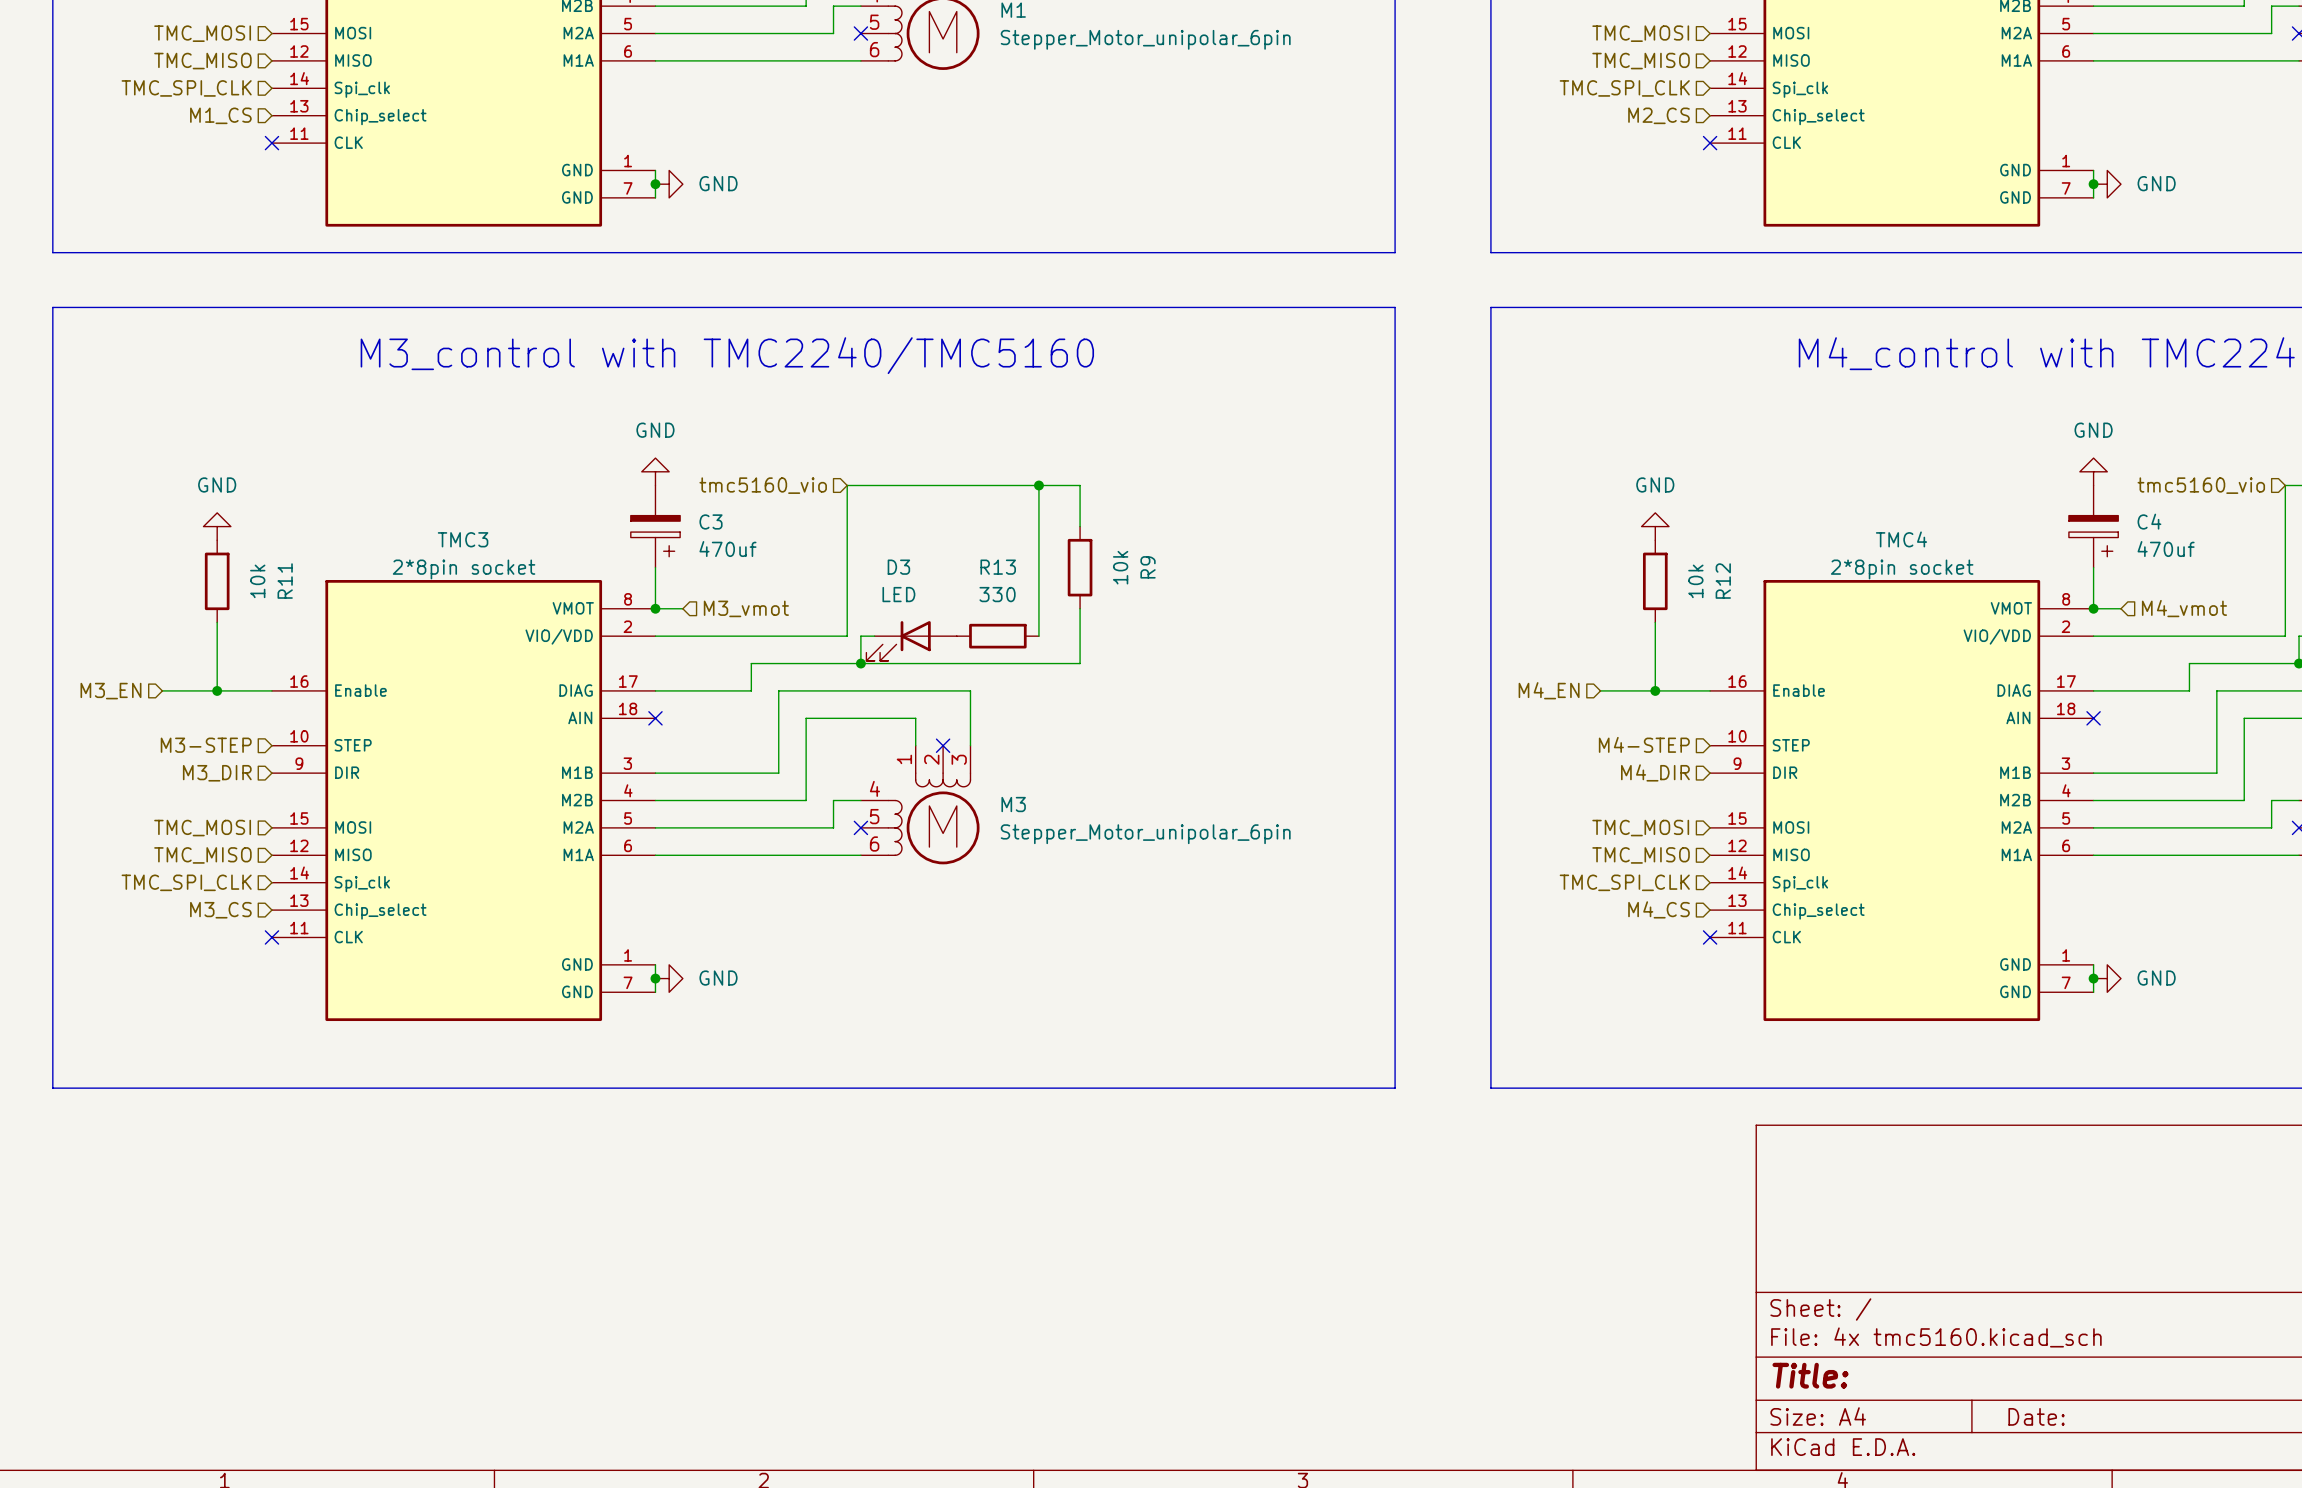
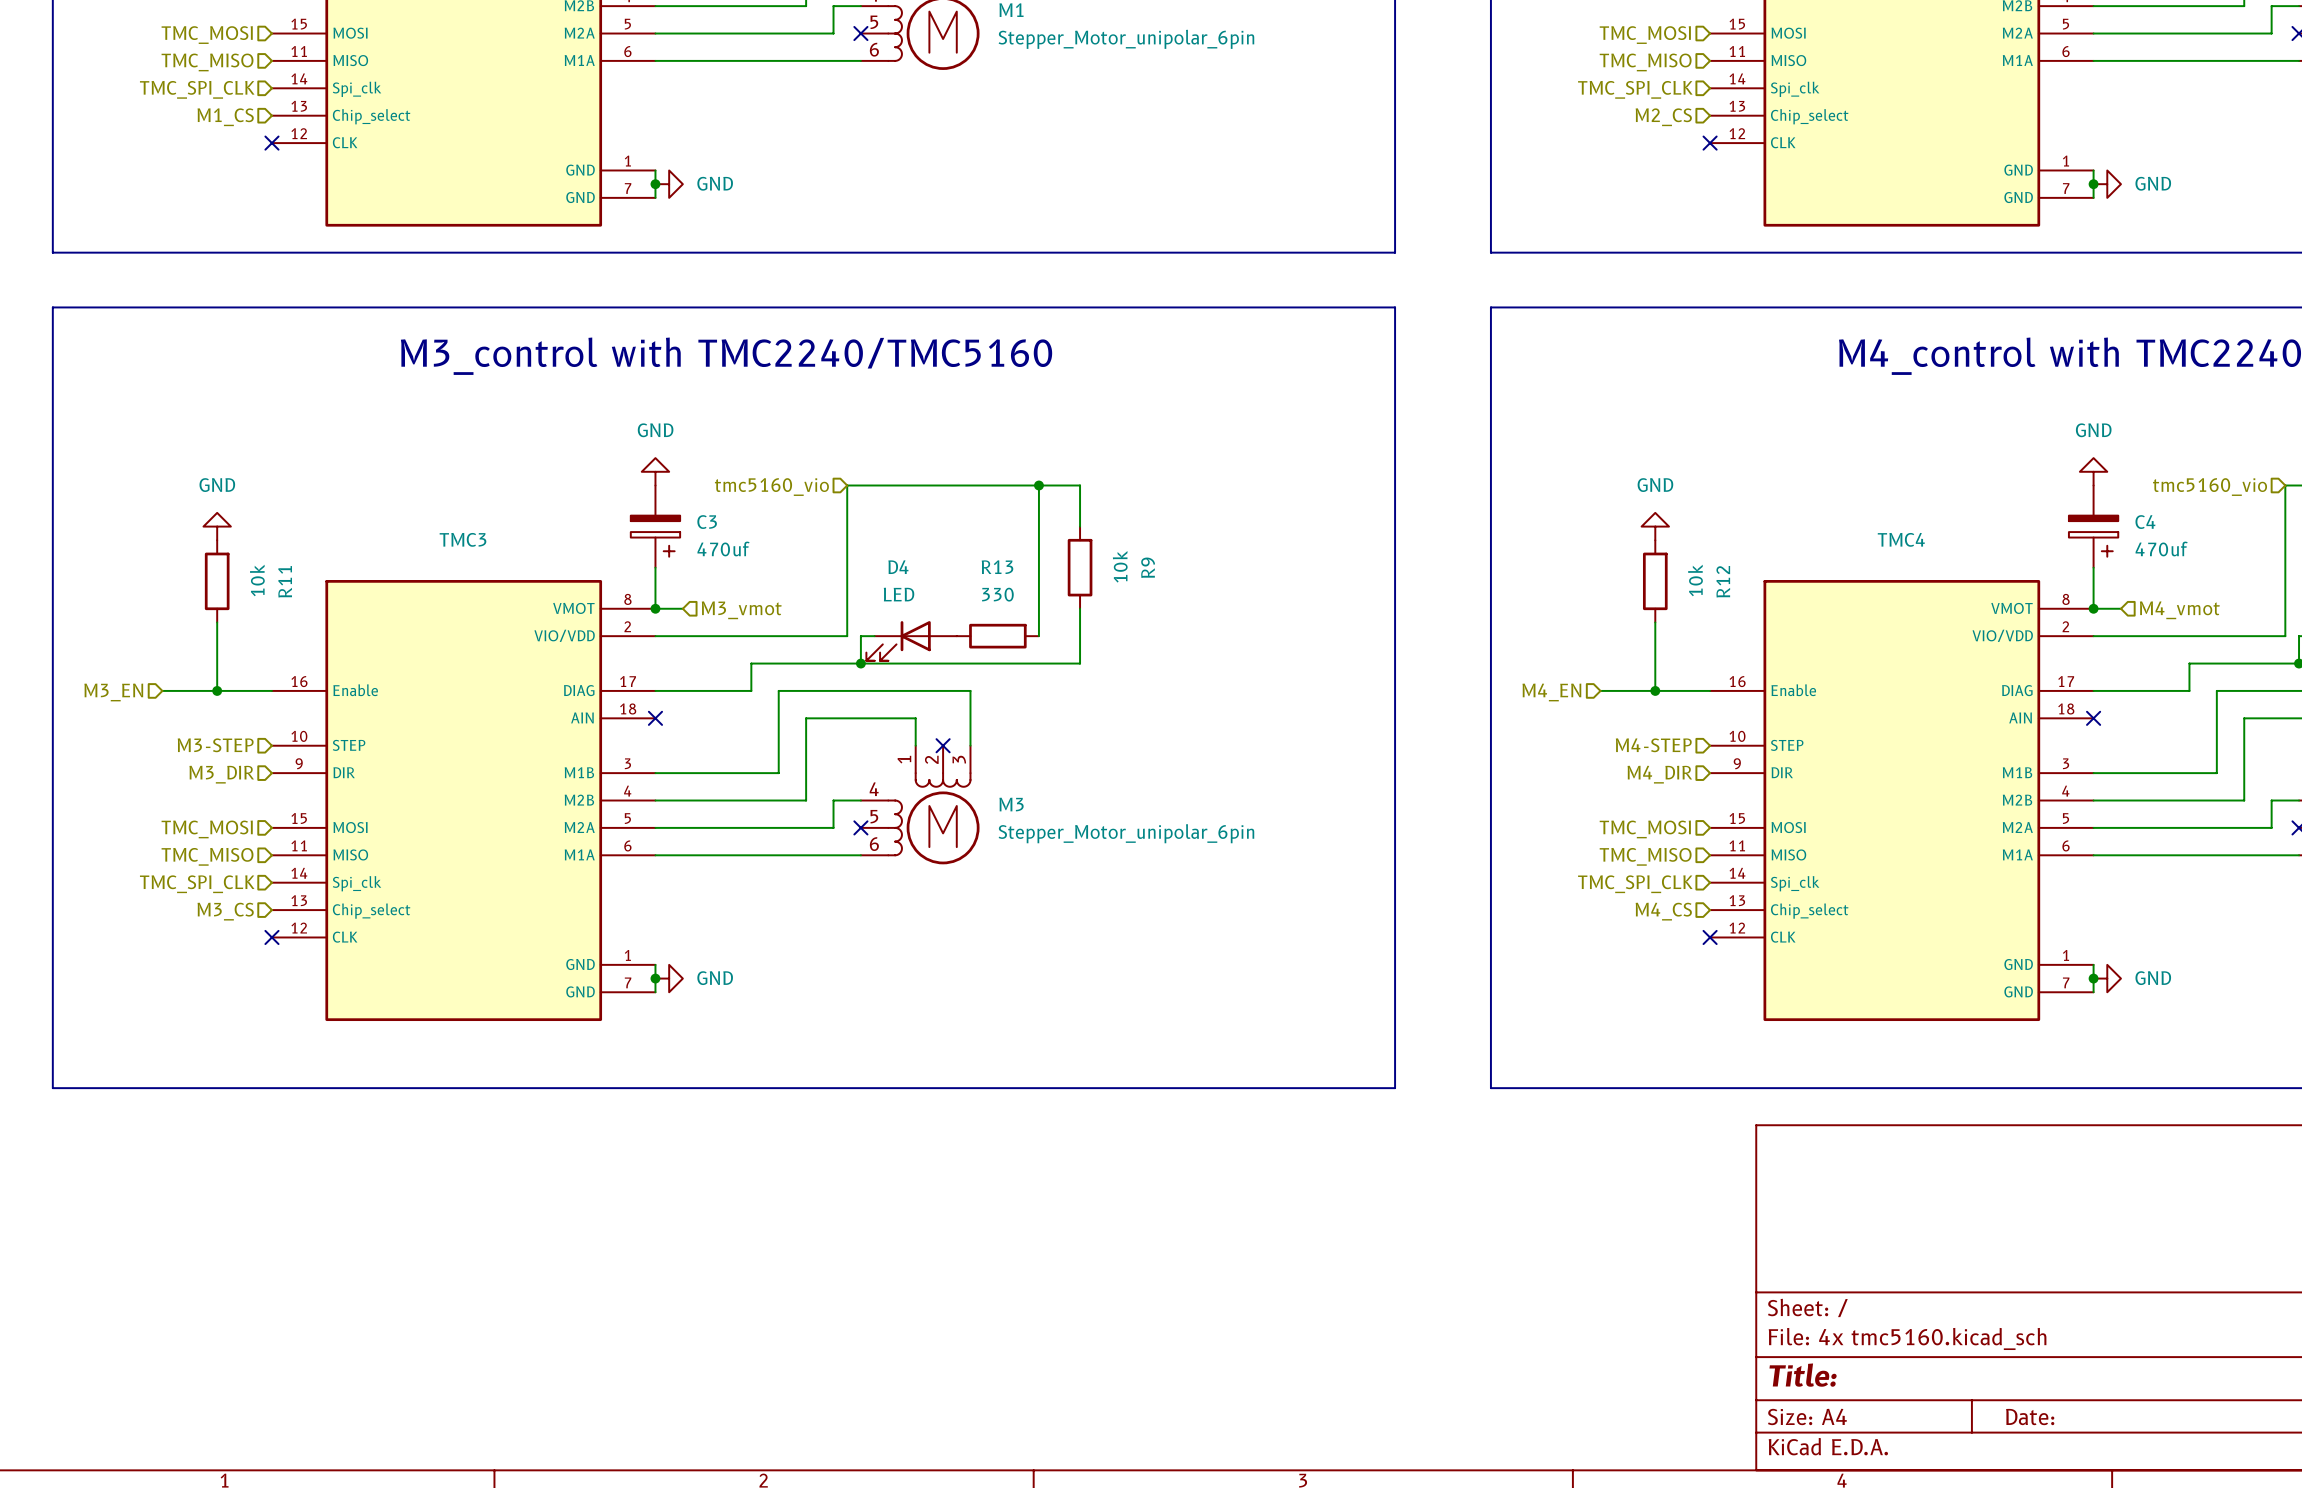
part pin number: 12 (299, 51) -> 11 (299, 51)
part pin number: 12 (1737, 51) -> 11 (1737, 51)
part pin number: 11 (299, 133) -> 12 (299, 133)
part pin number: 11 (1737, 133) -> 12 (1737, 133)
D3 name: D3 (898, 567) -> D4 (898, 567)
TMC3 value: 2*8pin socket (464, 569) -> none
TMC4 value: 2*8pin socket (1902, 569) -> none
TMC3 pin number: 12 (299, 845) -> 11 (299, 845)
TMC4 pin number: 12 (1737, 845) -> 11 (1737, 845)
TMC3 pin number: 11 (299, 928) -> 12 (299, 928)
TMC4 pin number: 11 (1737, 928) -> 12 (1737, 928)

